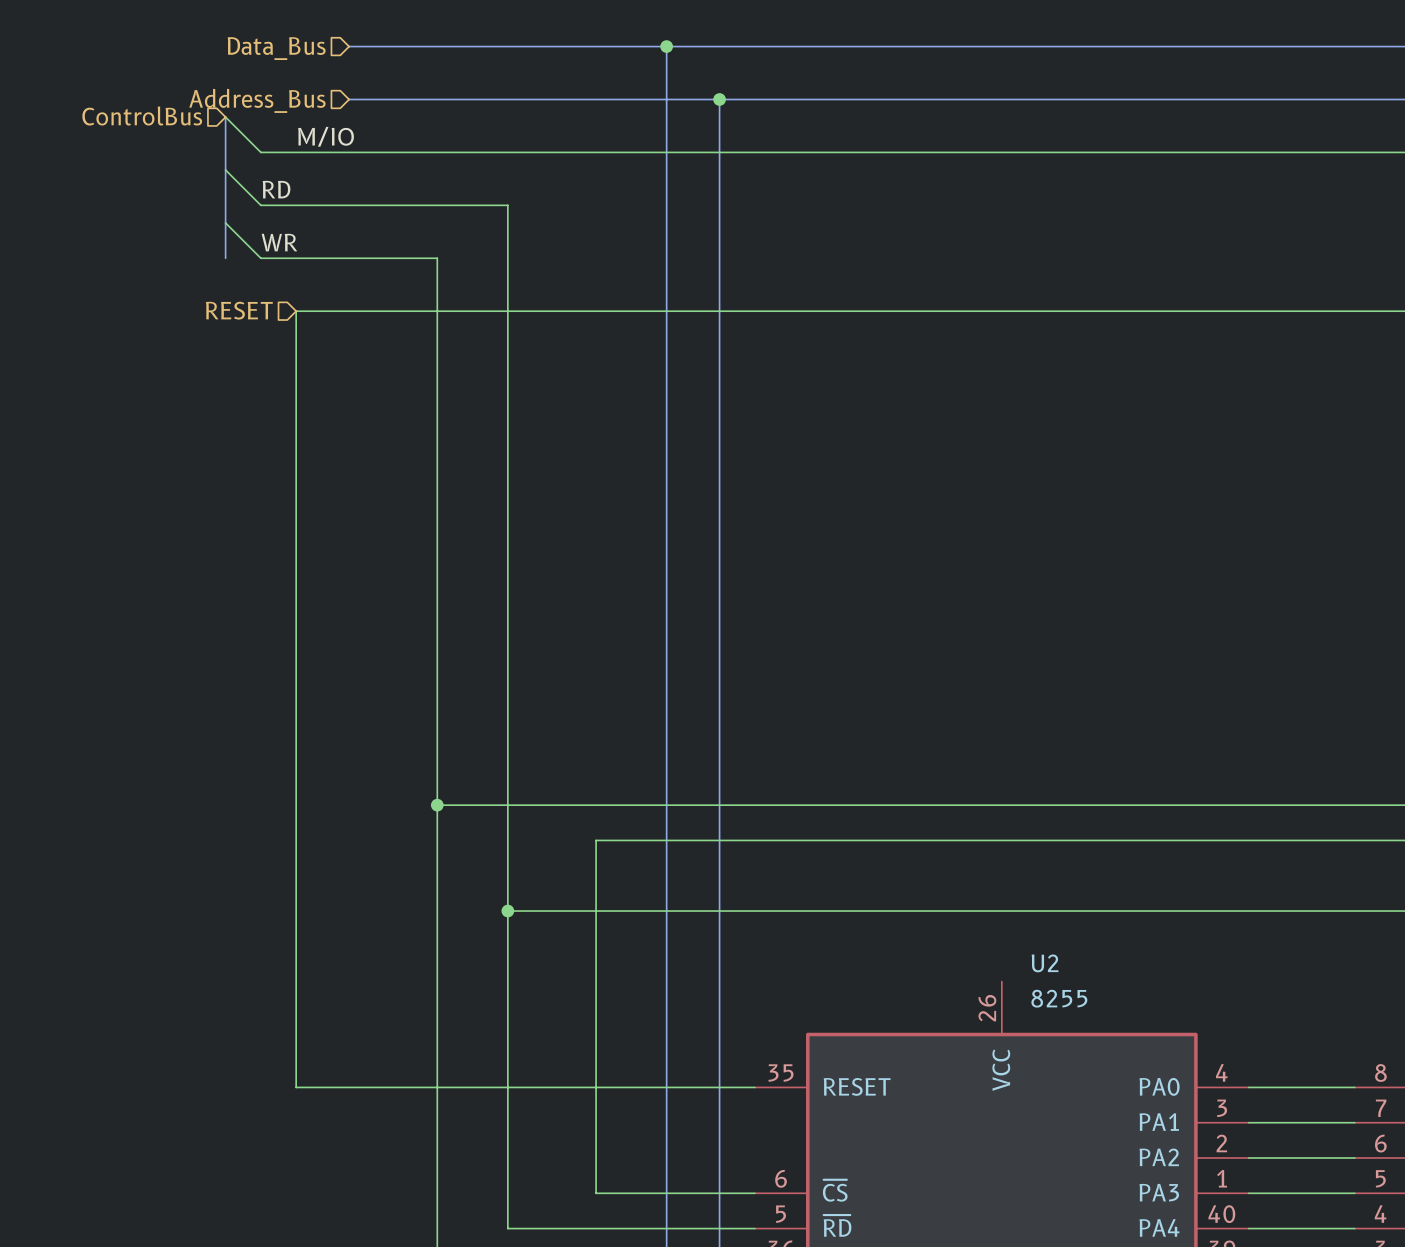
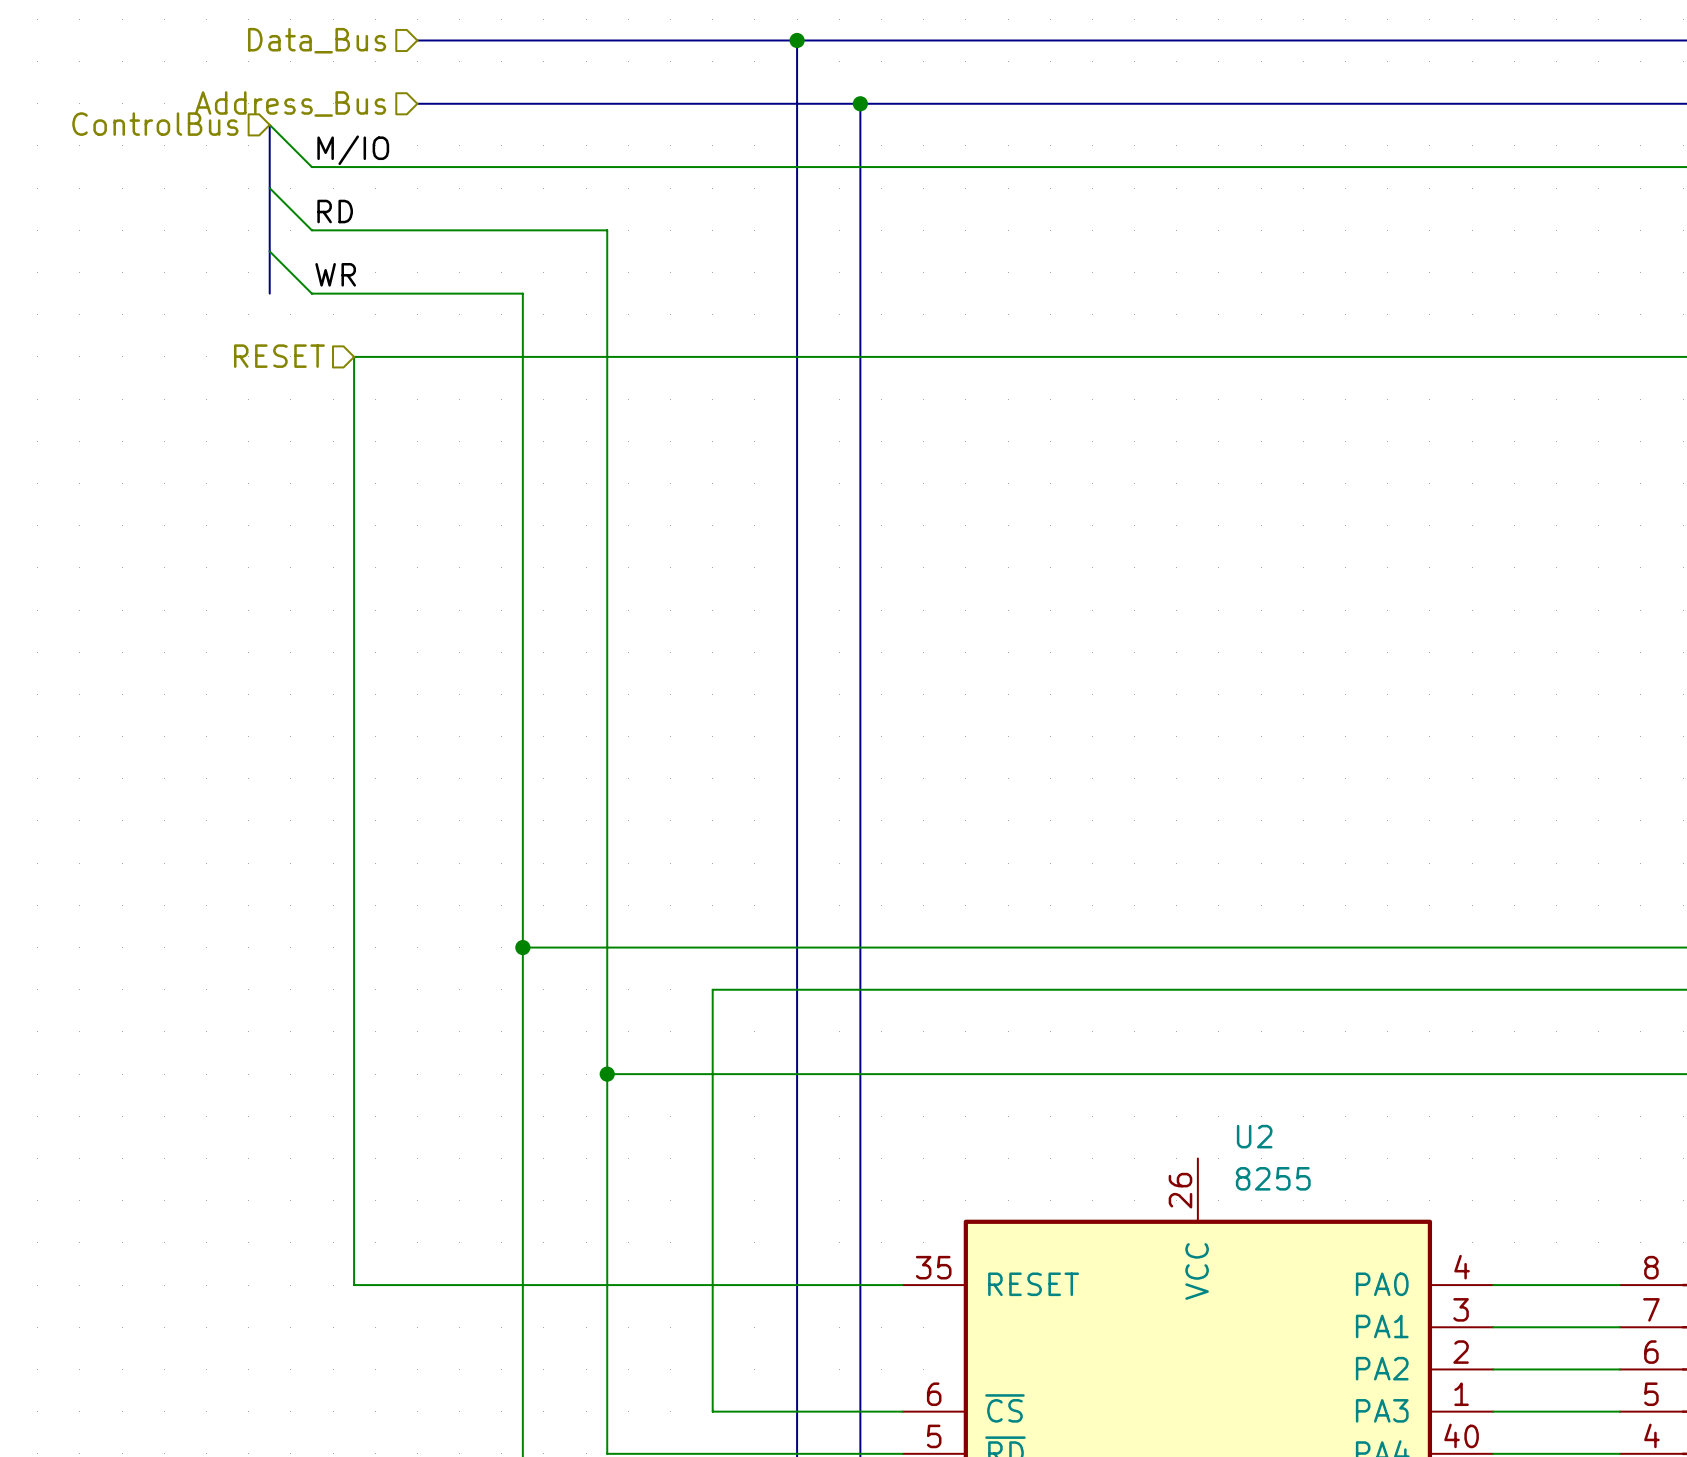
label position: M/IO (326, 136) -> M/IO (353, 150)

